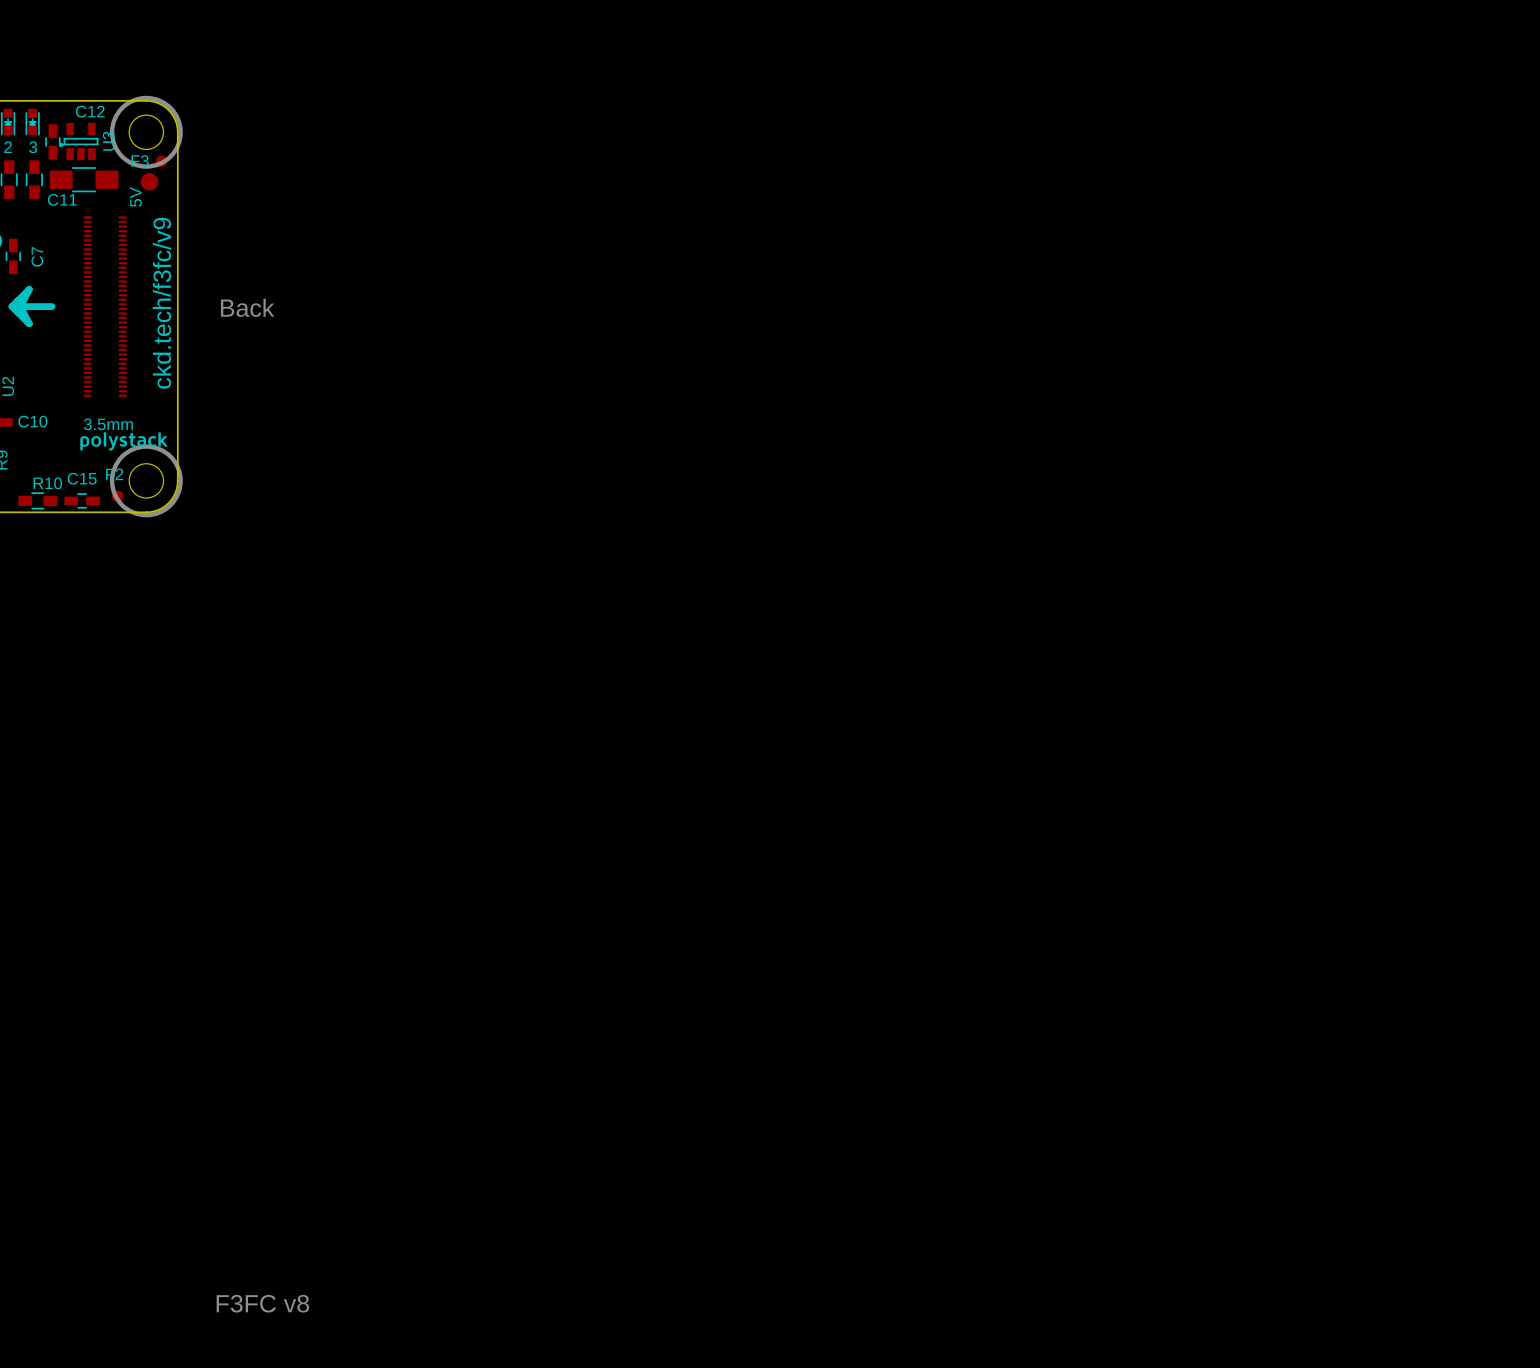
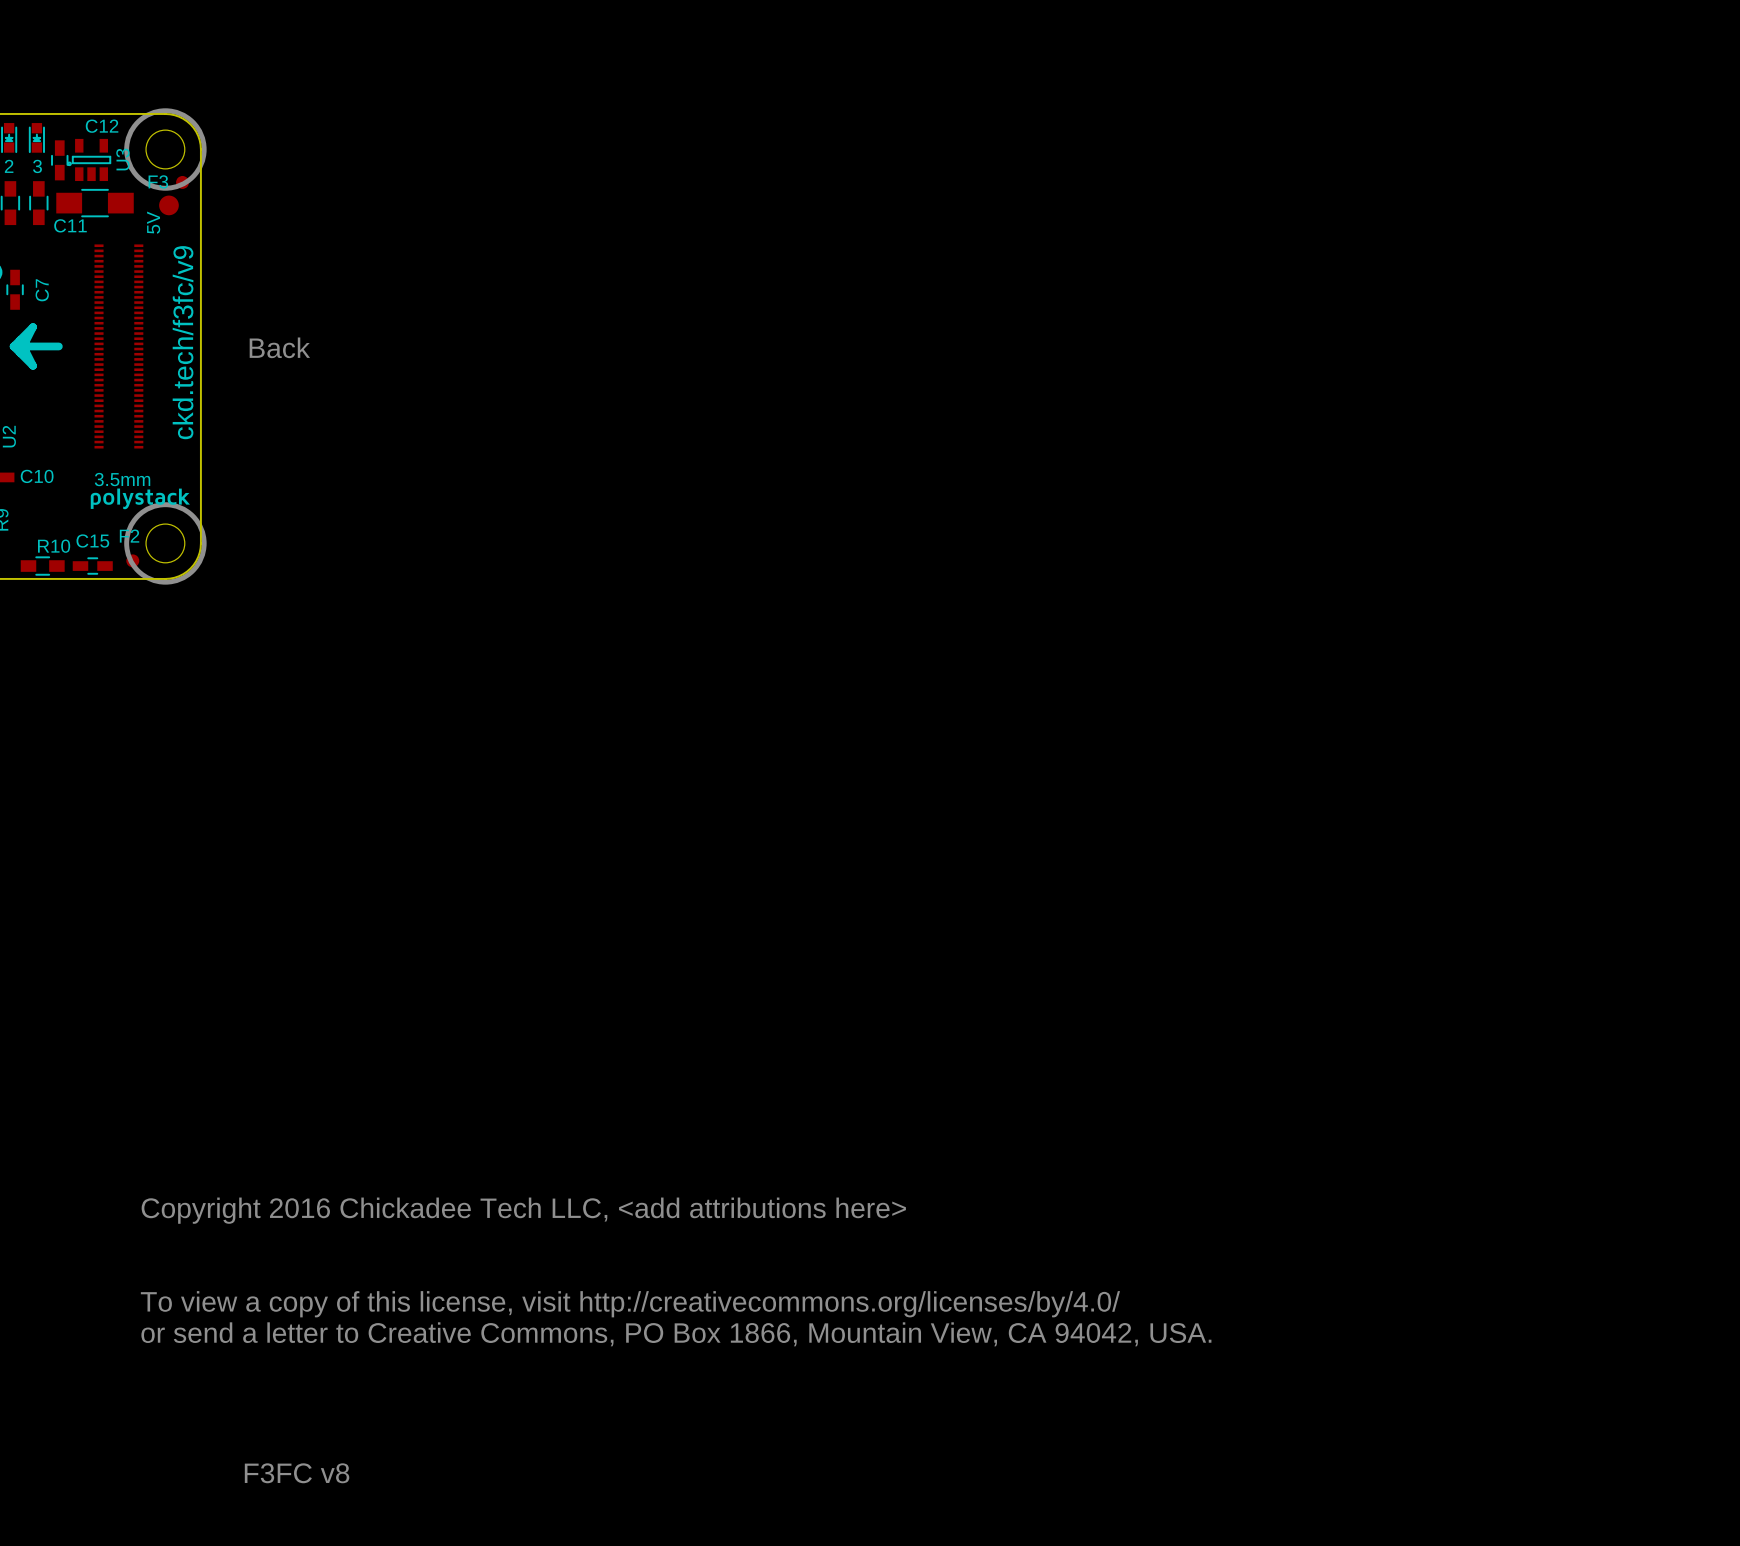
text: none -> Copyright 2016 Chickadee Tech LLC, <add attributions here> (523, 1210)
text: none -> To view a copy of this license, visit http://creativecommons.org/licenses/by/4.0/ (630, 1304)
text: none -> or send a letter to Creative Commons, PO Box 1866, Mountain View, CA 94042, USA. (676, 1334)

